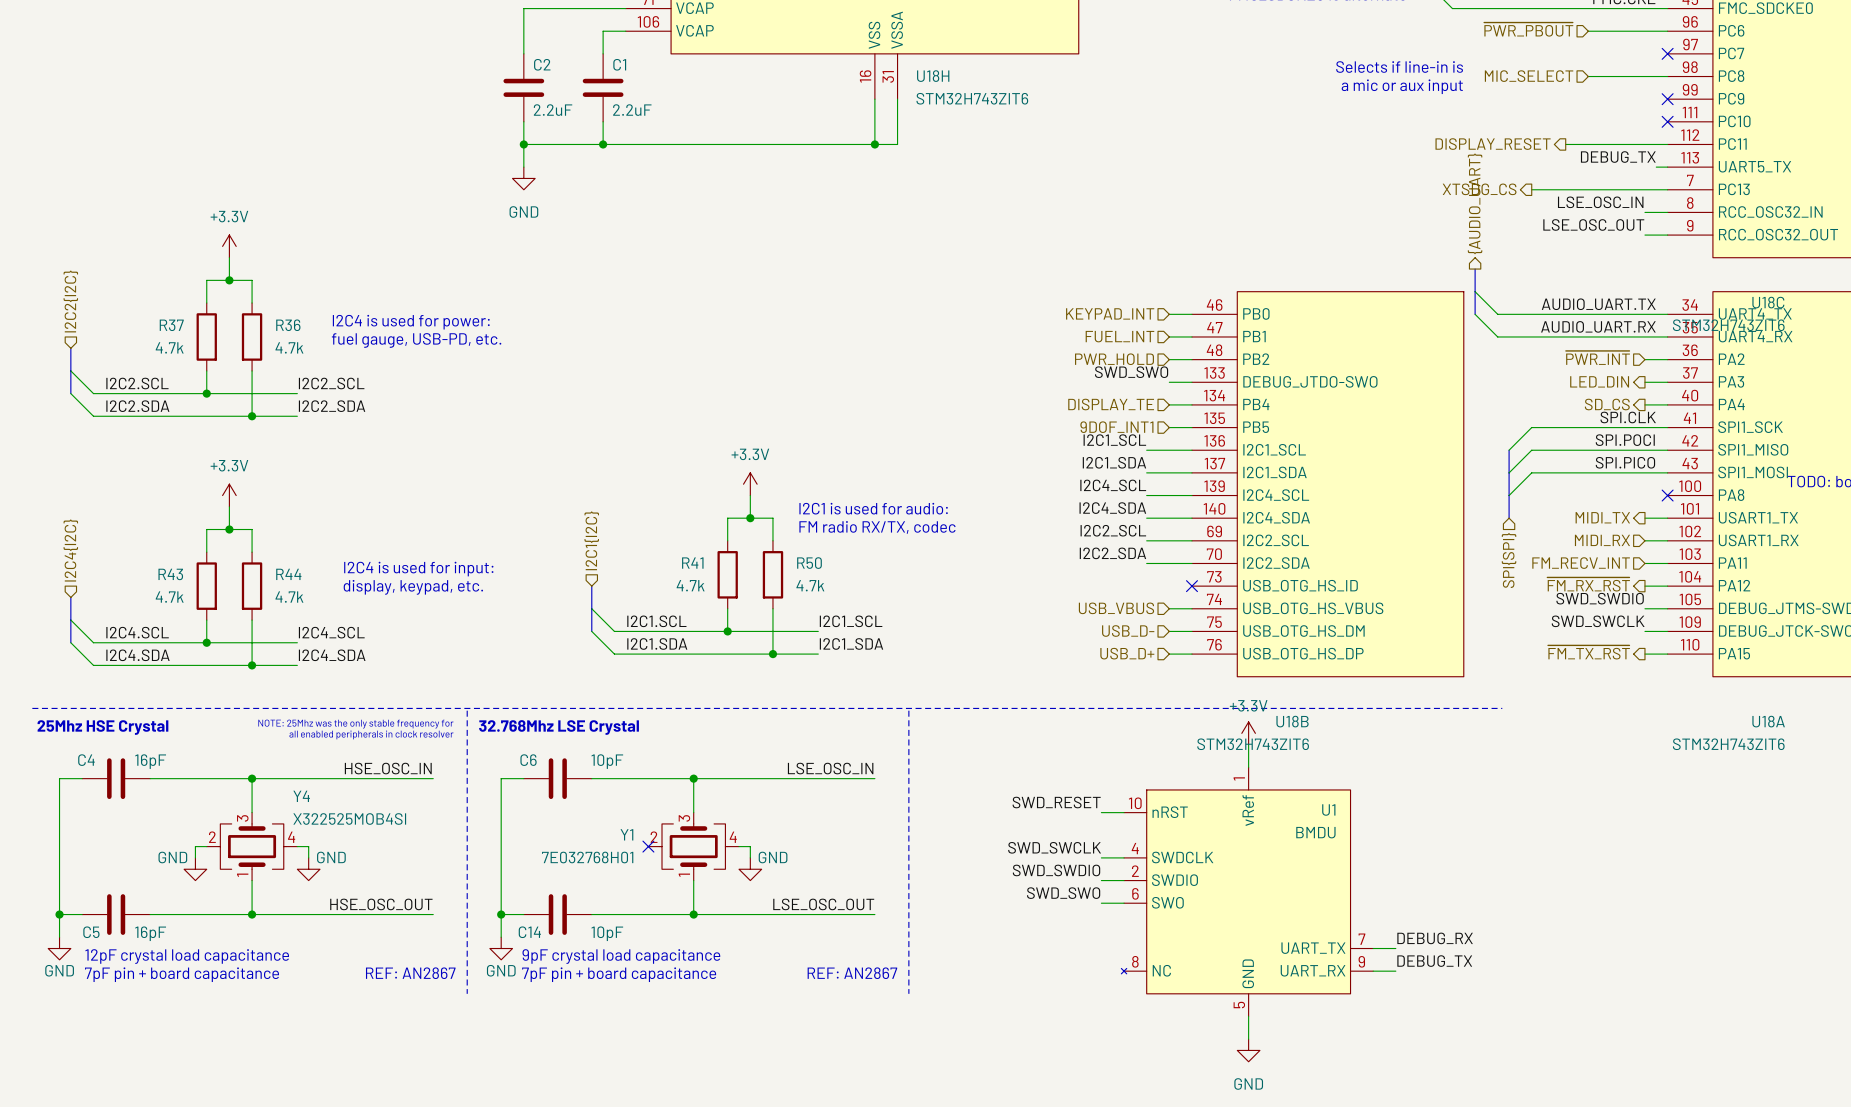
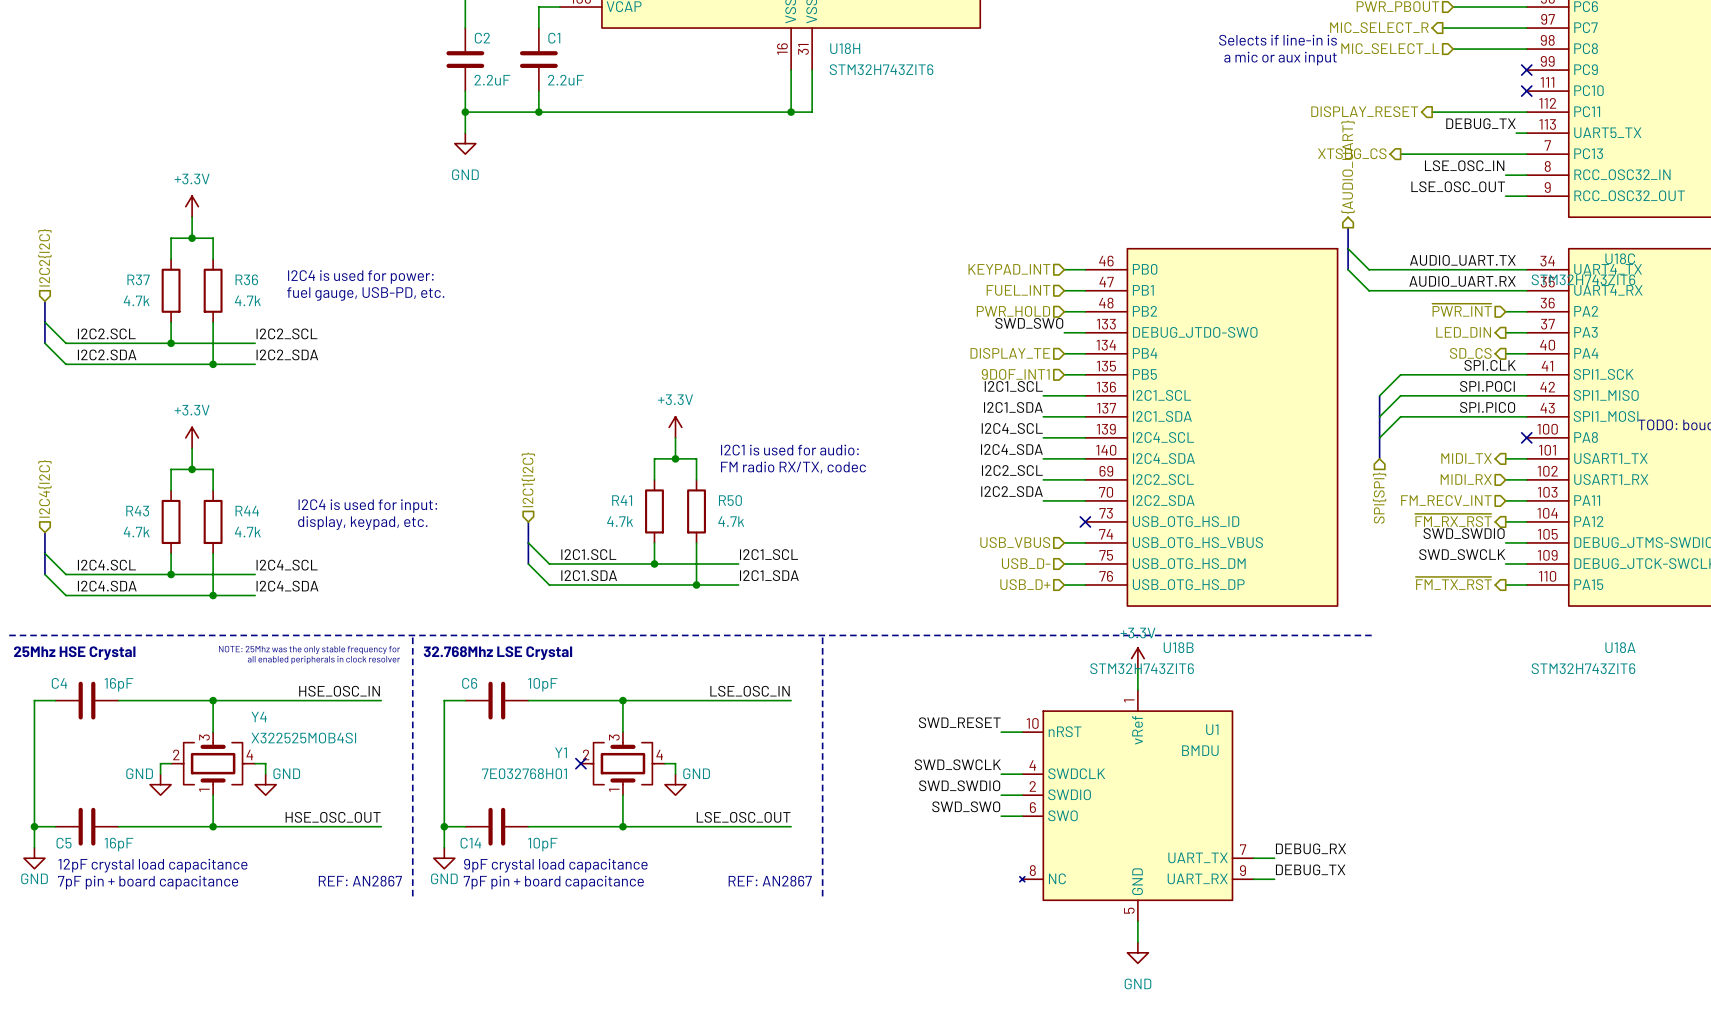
hierarchical label: none -> MIC_SELECT_R (1379, 27)
wire: none -> (1442, 28) (1526, 28)
no-connect mark: (1667, 53) -> none
hierarchical label: MIC_SELECT (1529, 76) -> MIC_SELECT_L (1390, 48)

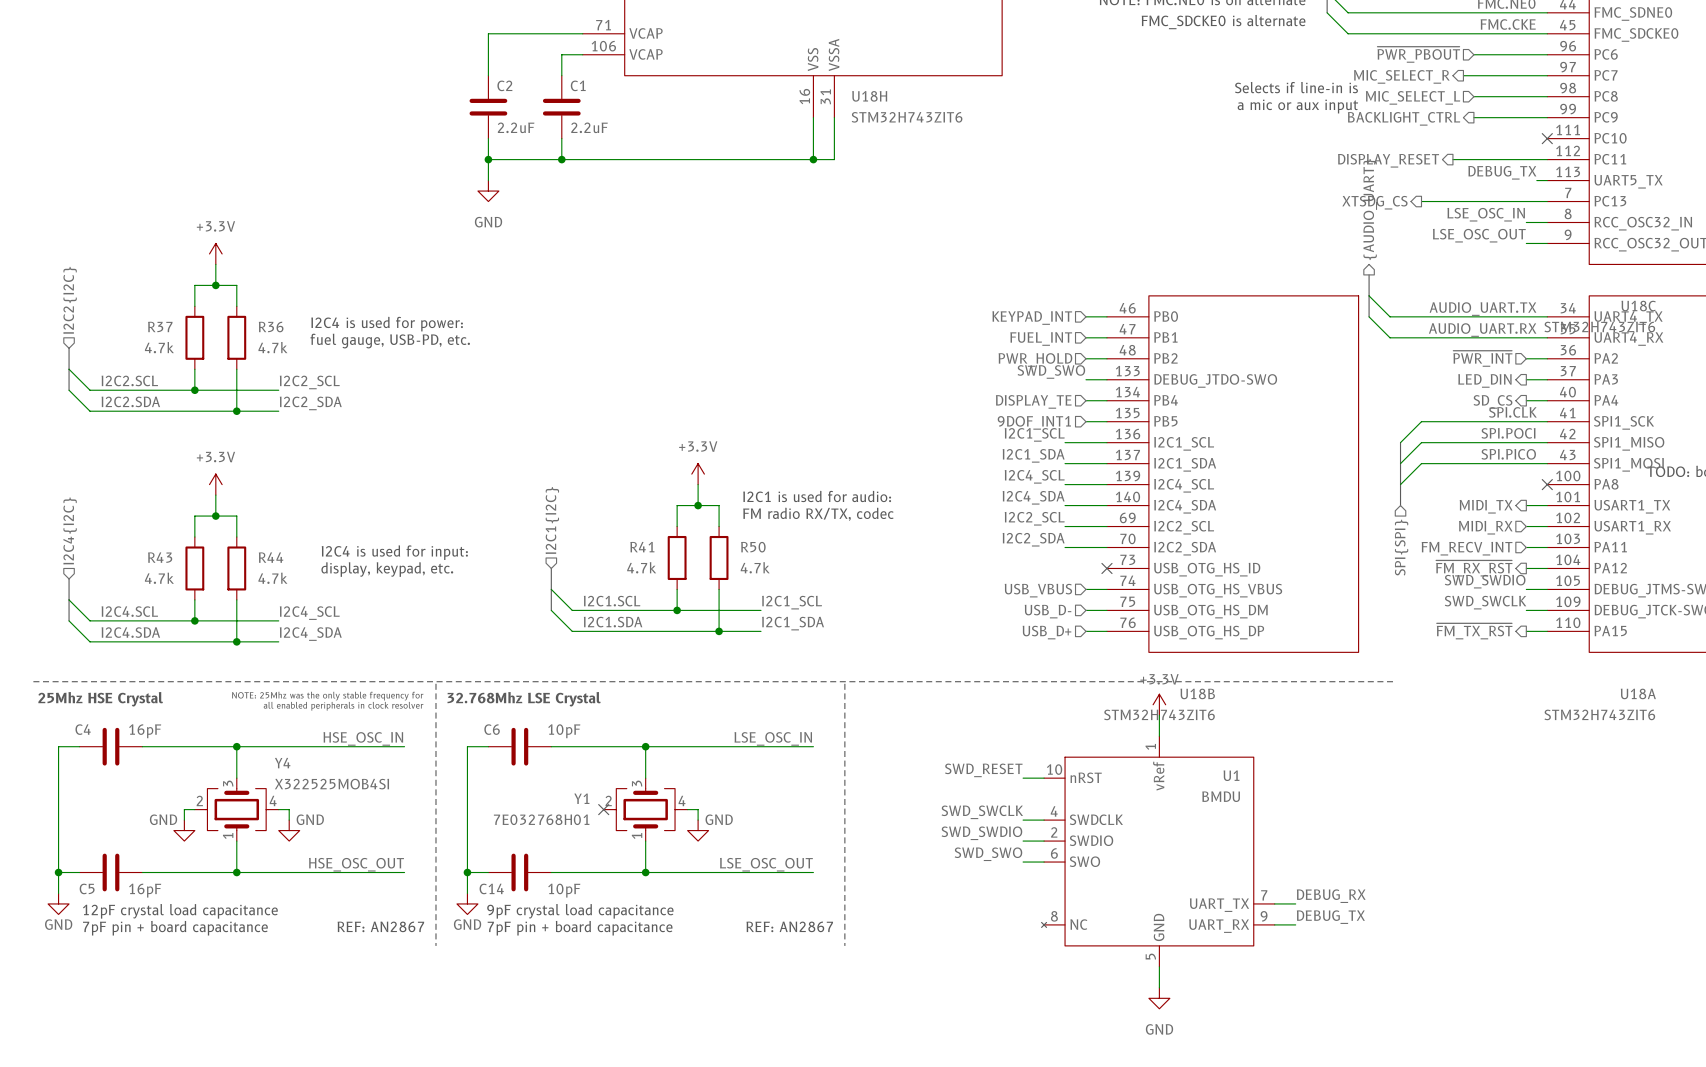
hierarchical label: none -> BACKLIGHT_CTRL (1404, 118)
wire: none -> (1473, 117) (1547, 117)
no-connect mark: (1526, 70) -> none

